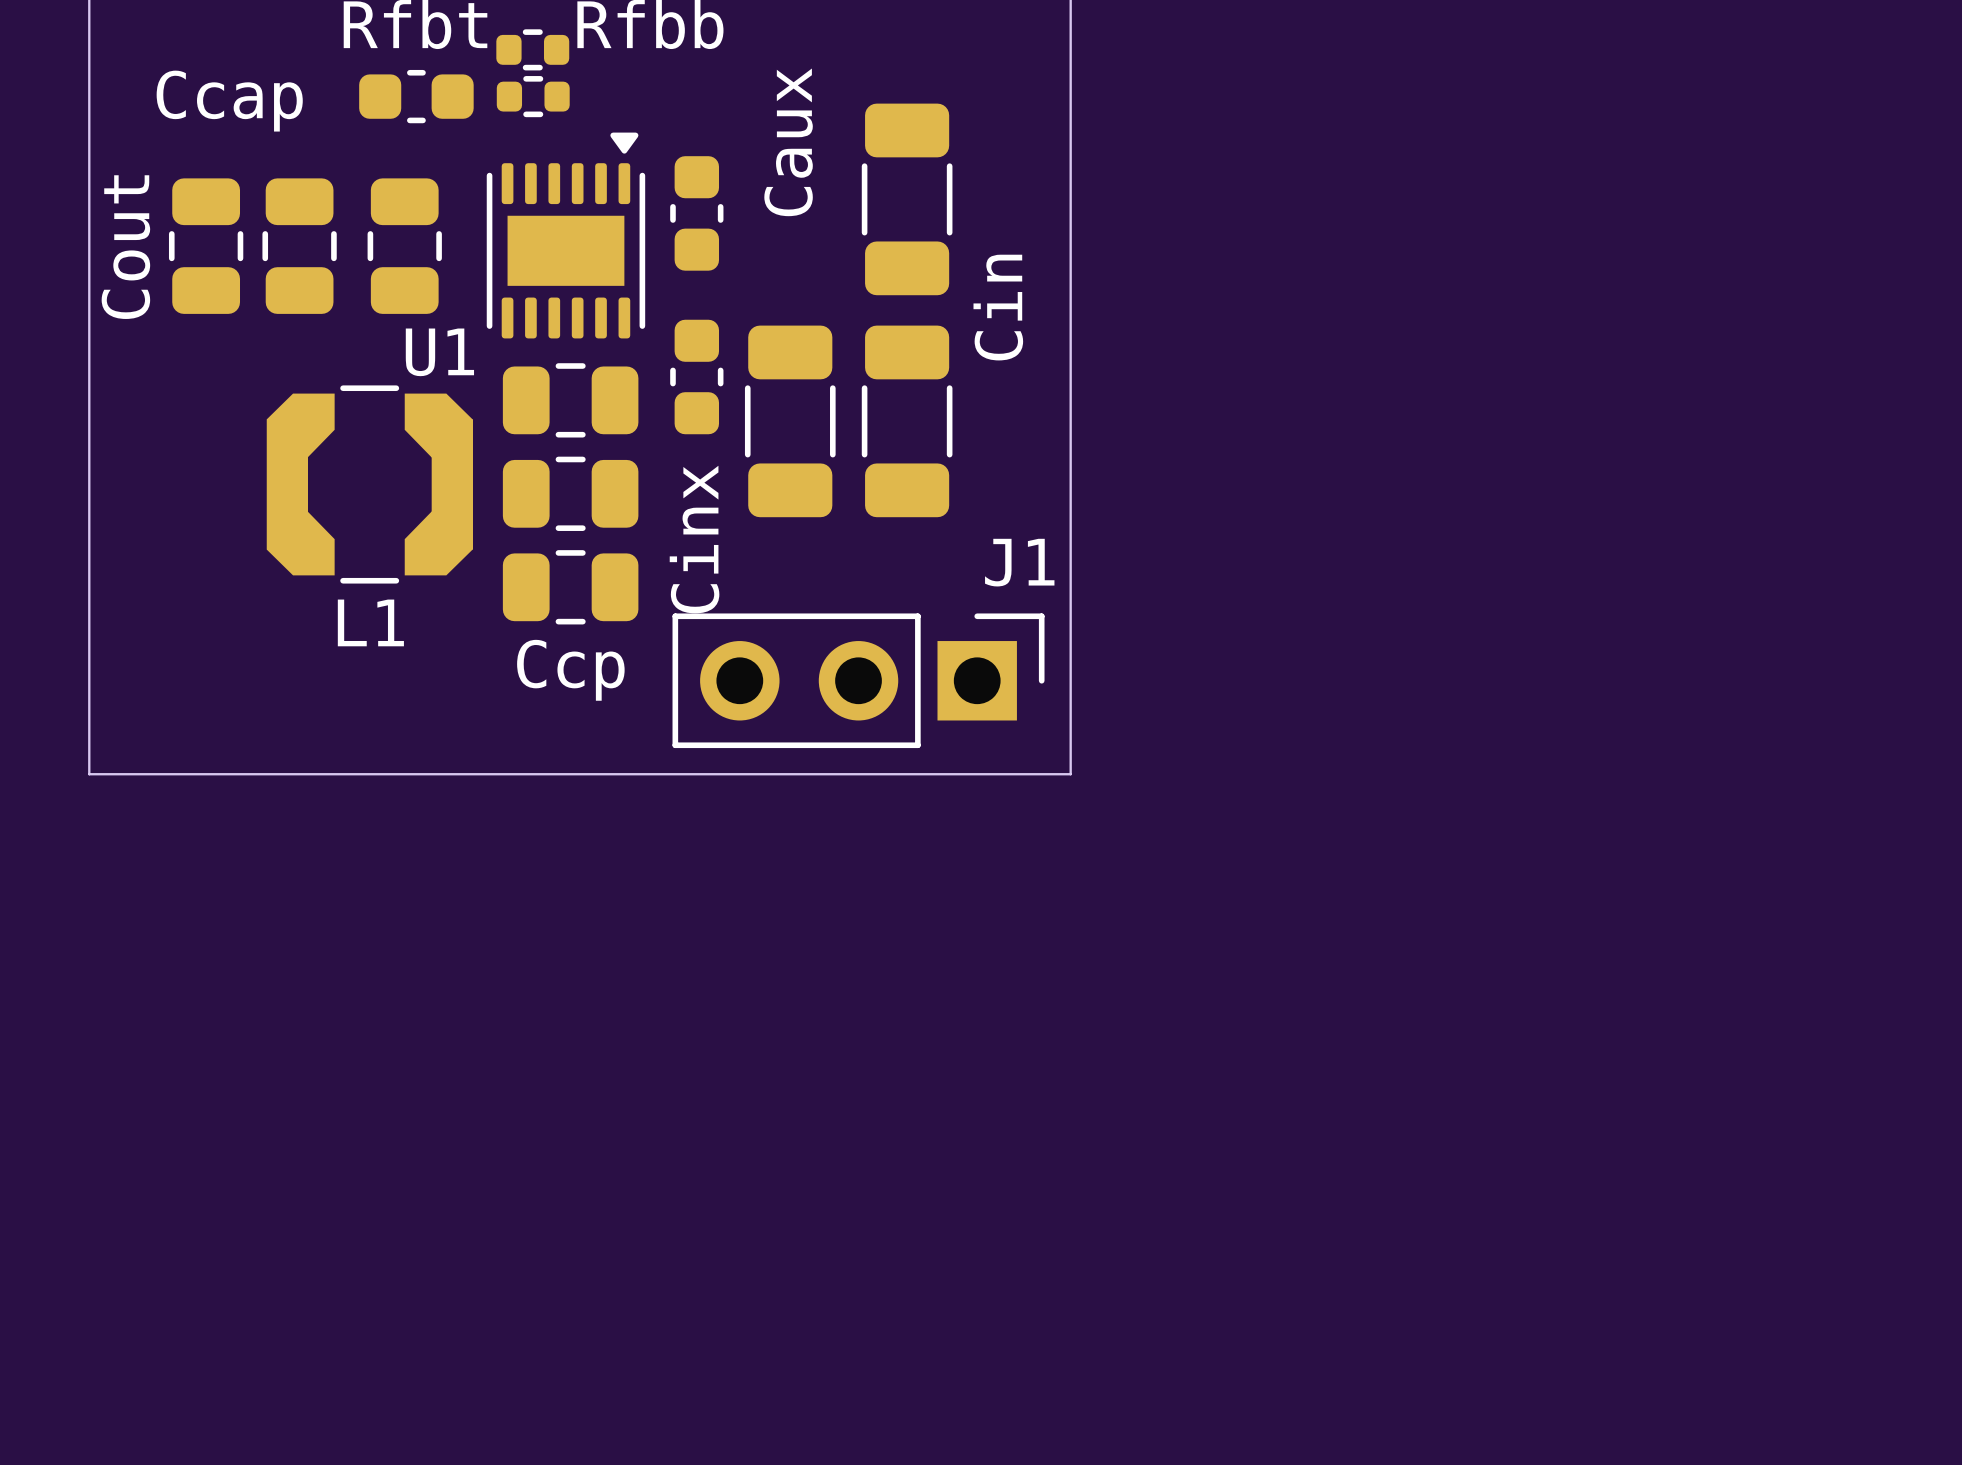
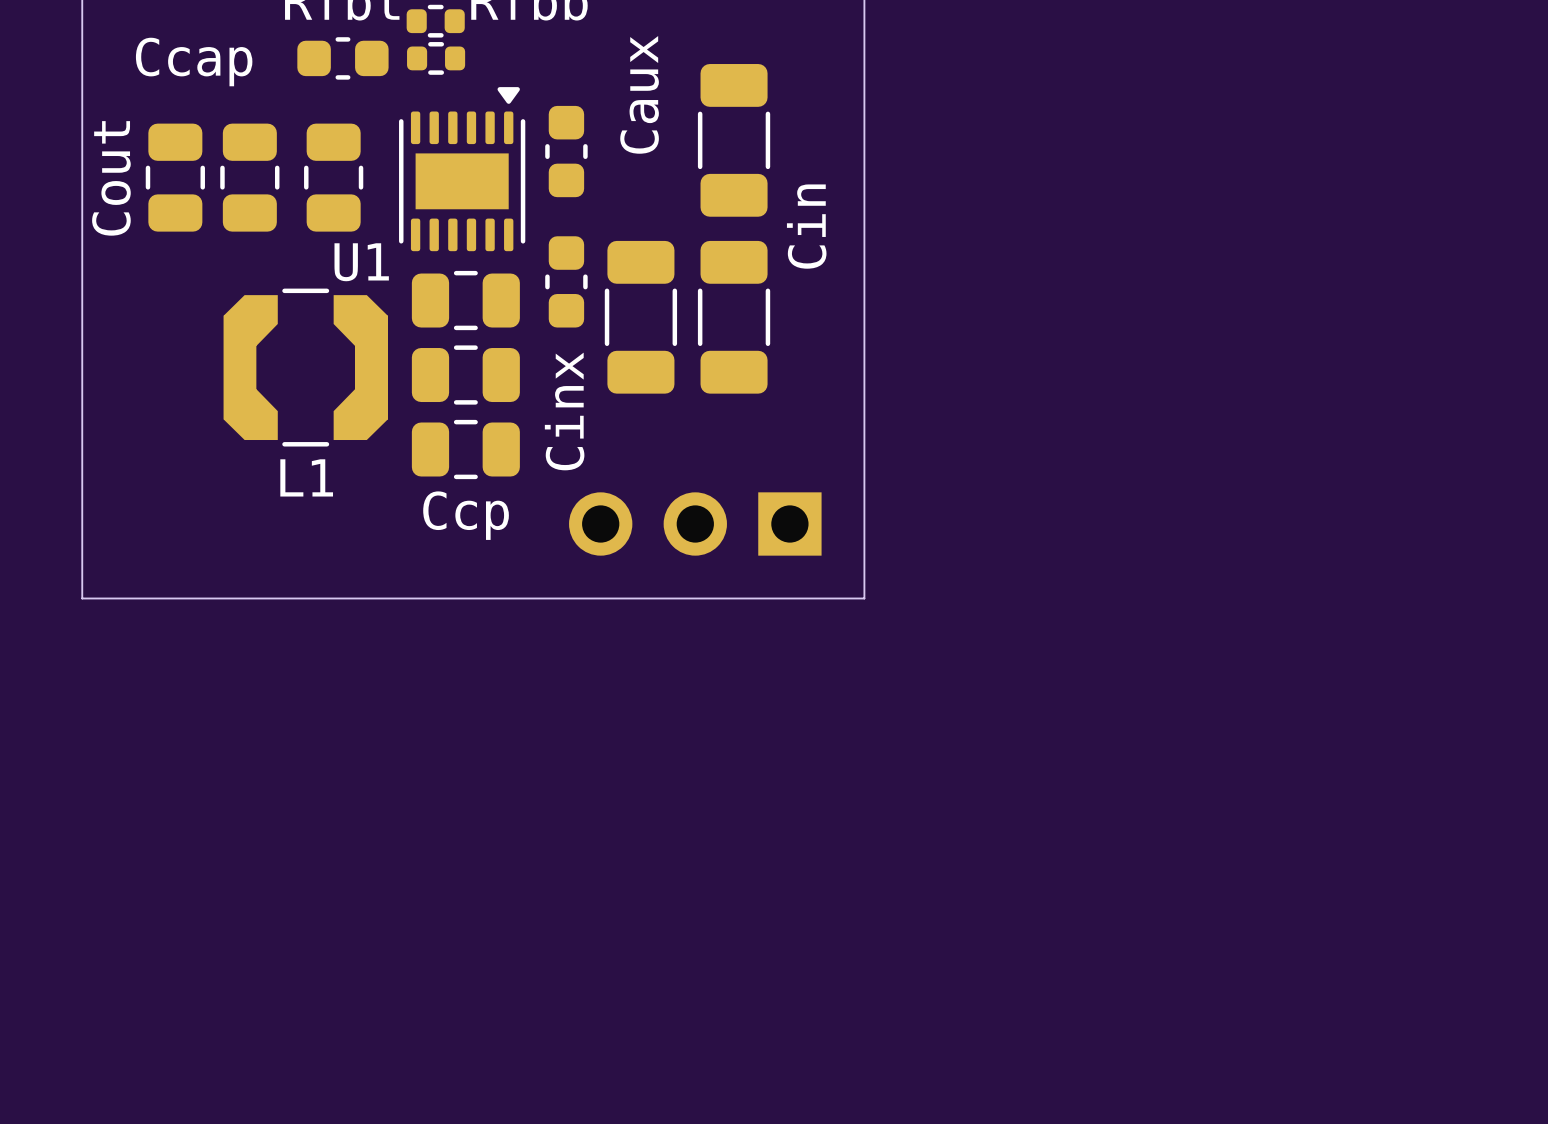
J1 side: top (858, 680) -> bottom (695, 523)

